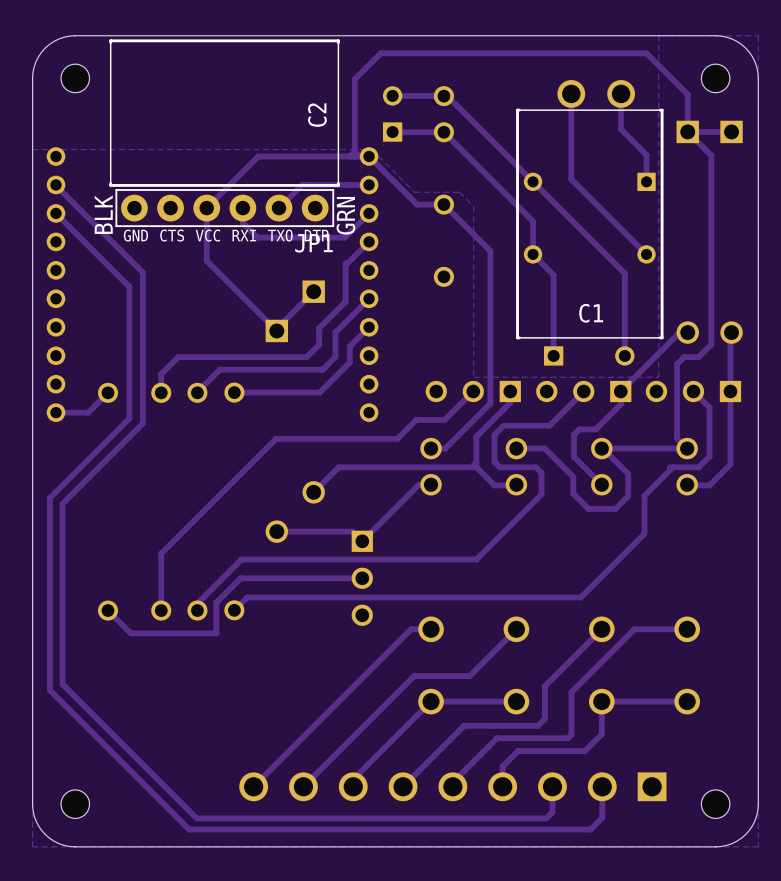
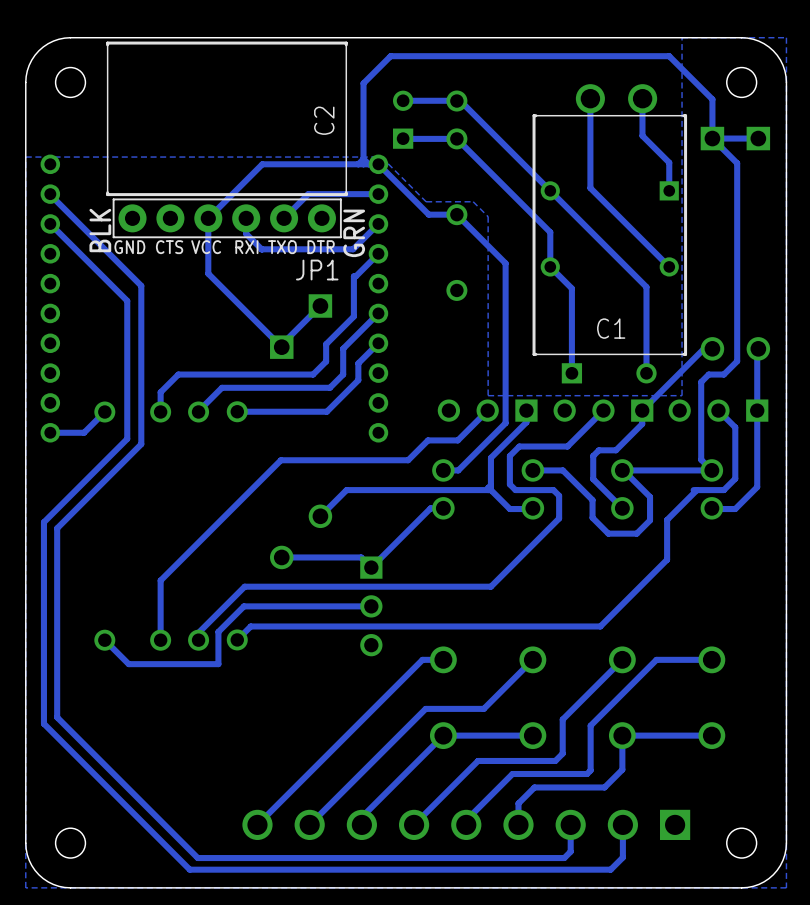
JP1 name position: JP1 (314, 243) -> JP1 (317, 270)

